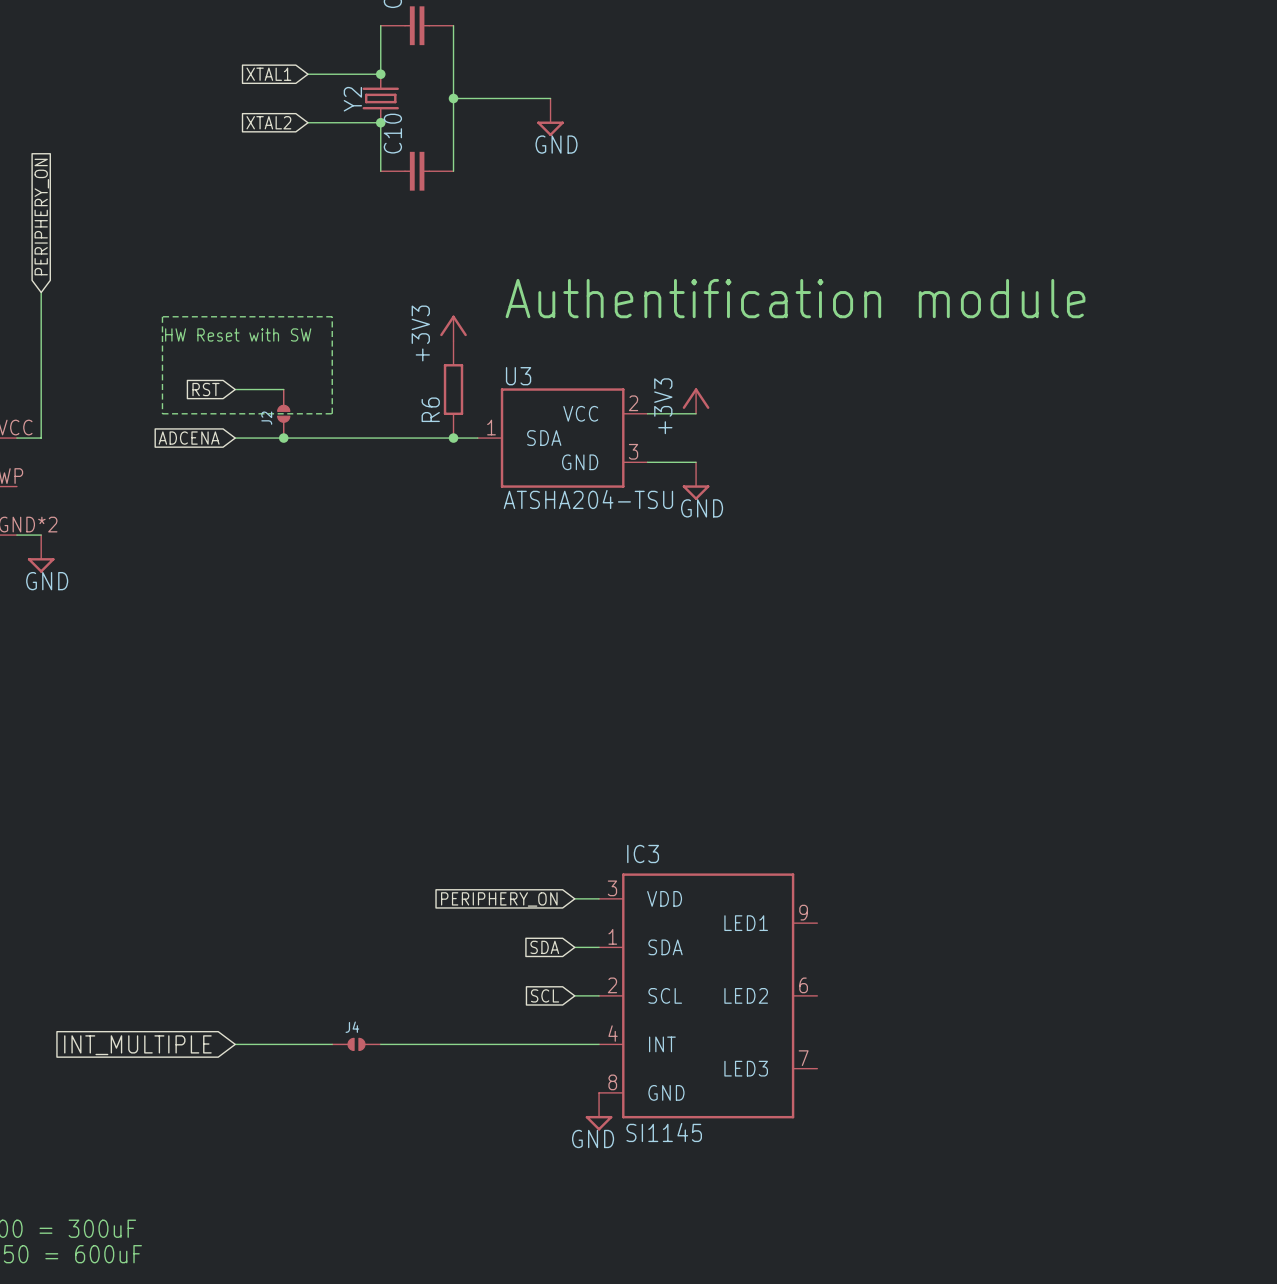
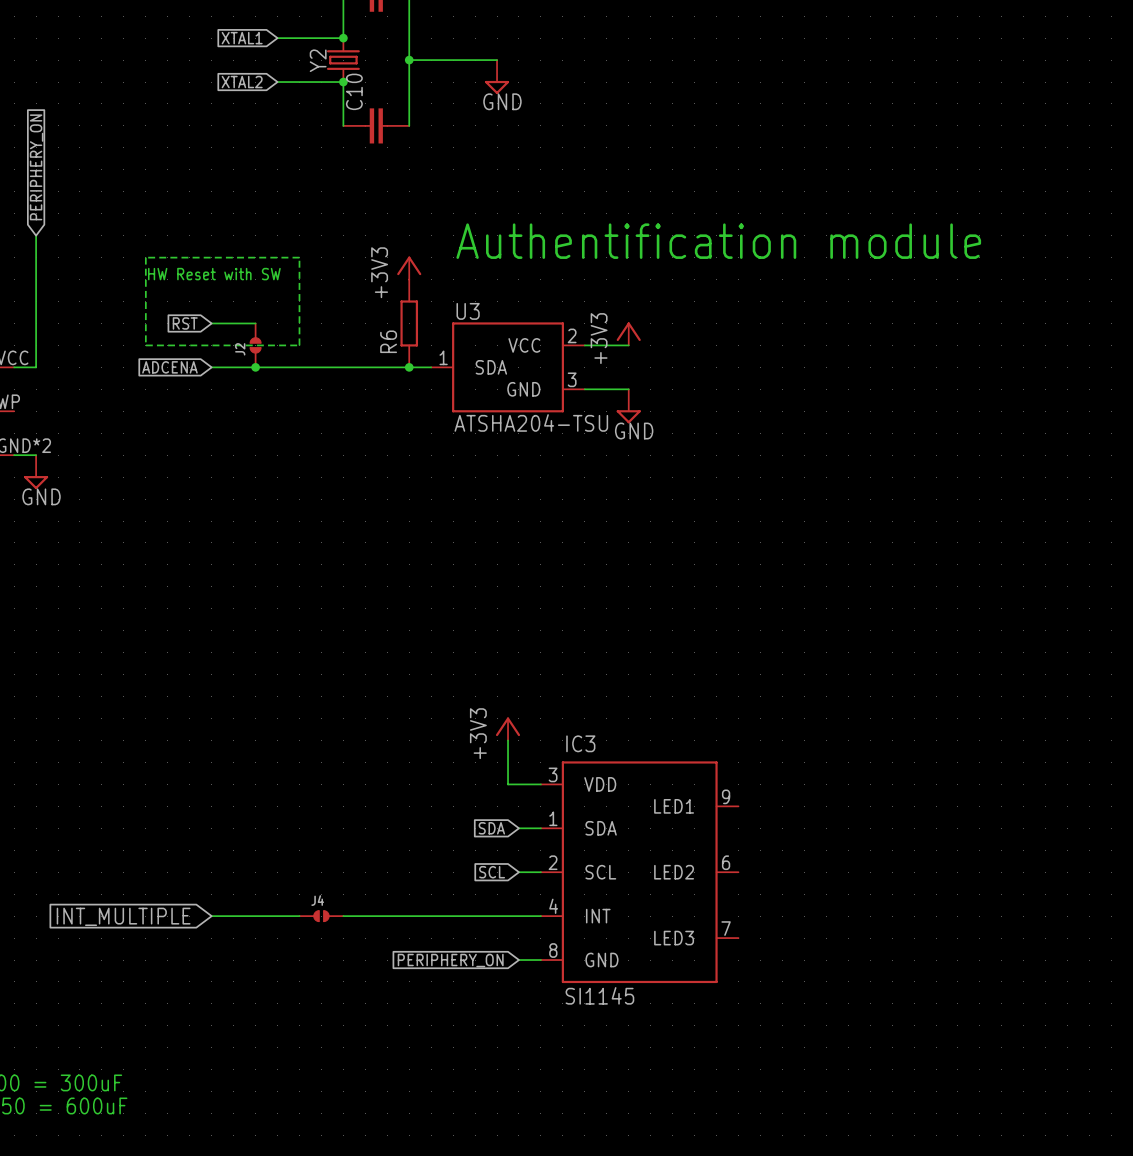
power symbol: none -> +3V3 (508, 728)
wire: none -> (508, 740) (508, 784) (518, 784)
global label position: PERIPHERY_ON (499, 899) -> PERIPHERY_ON (450, 960)
wire: none -> (518, 960) (540, 960)
power symbol: GND (599, 1111) -> none

